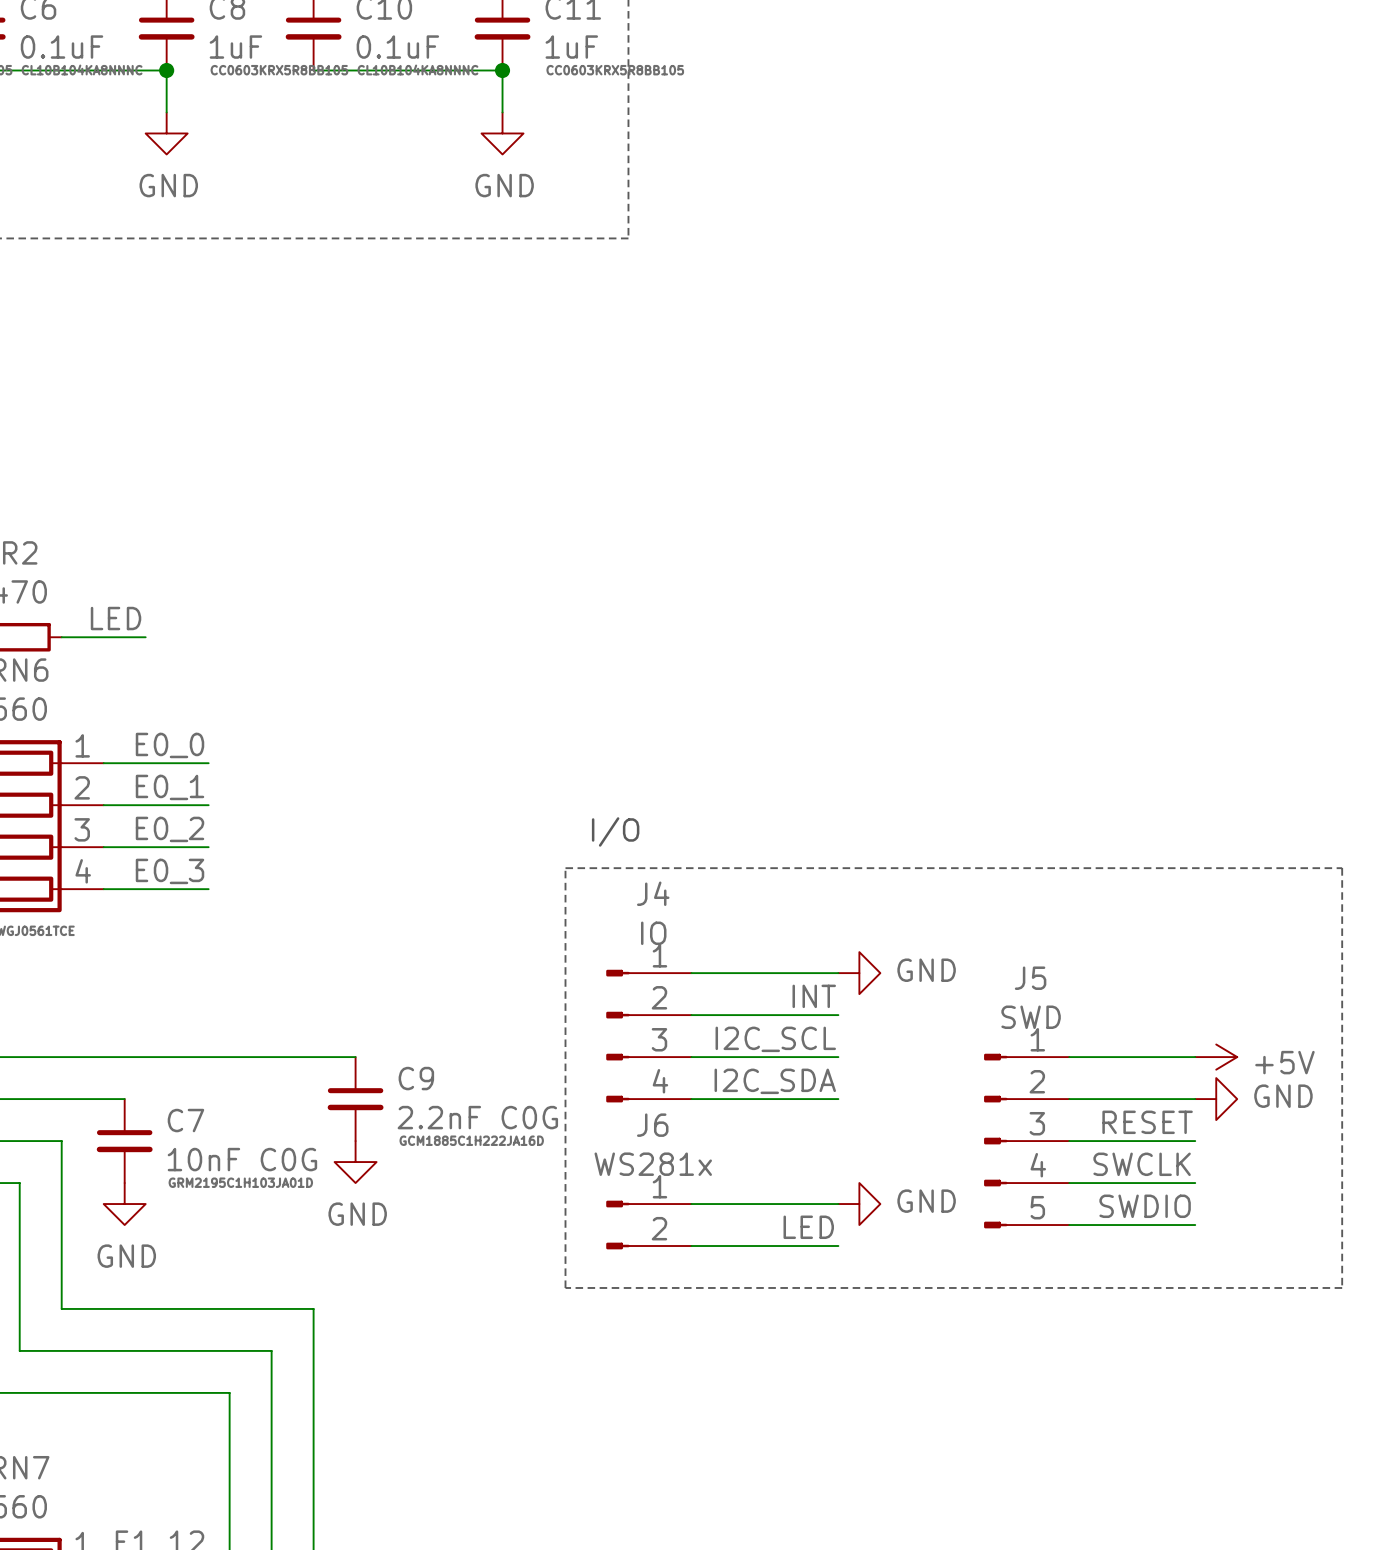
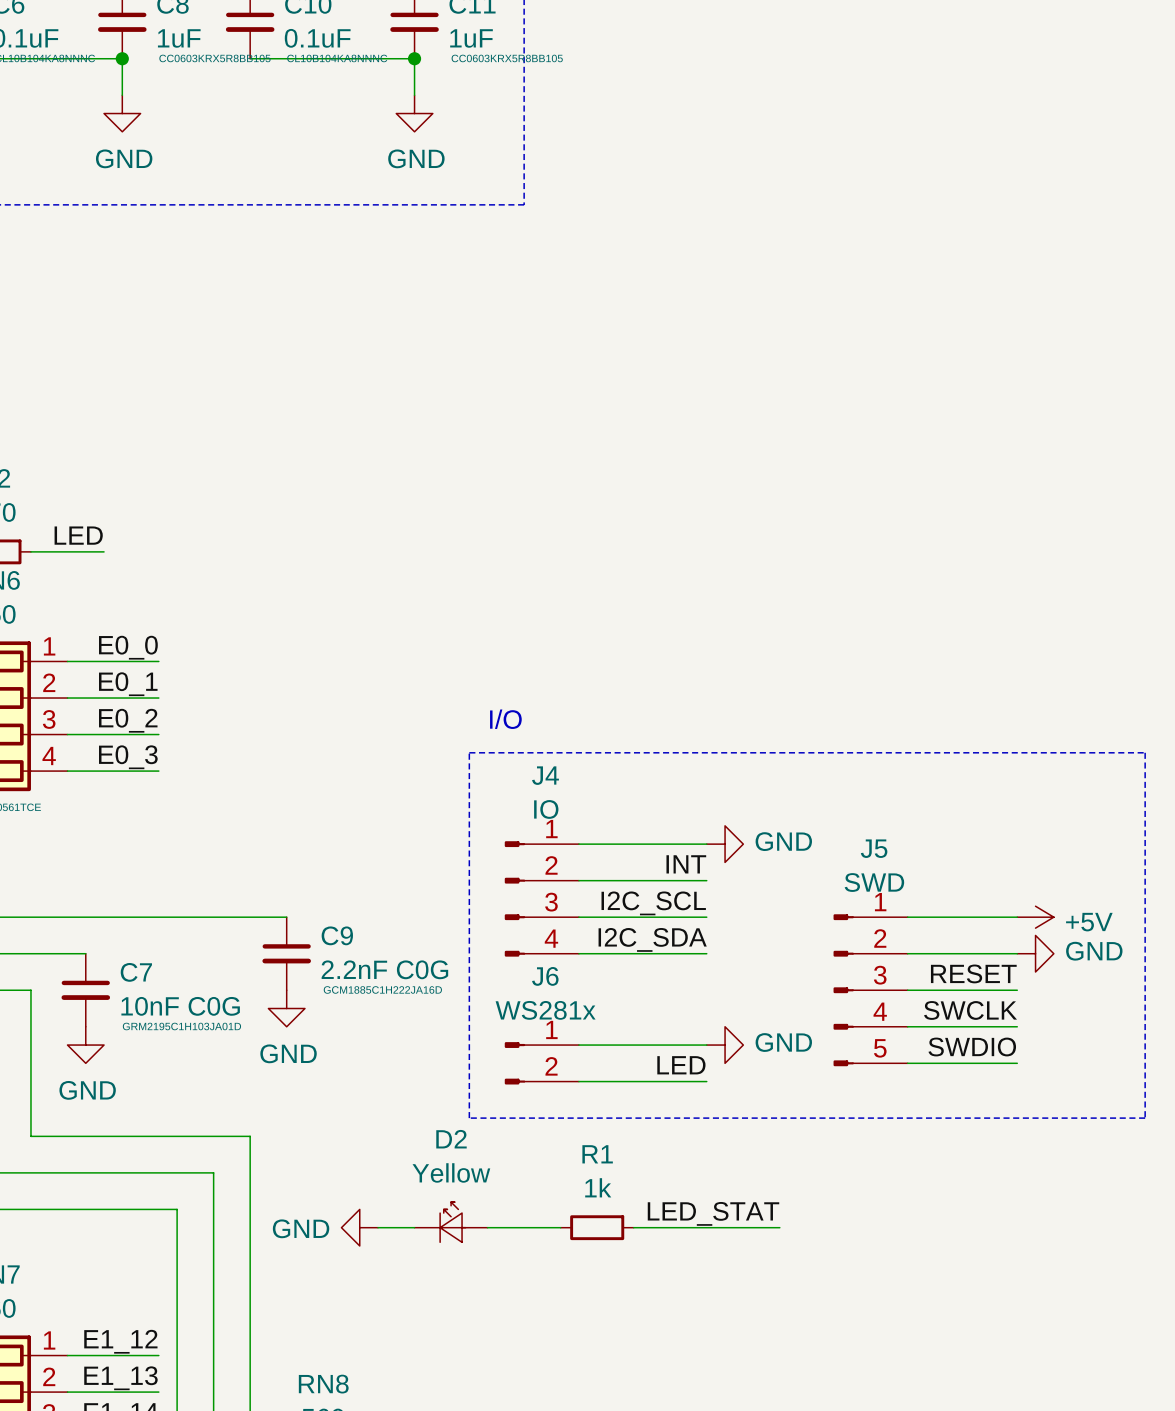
label: none -> LED_STAT (713, 1213)
D2: none -> Yellow (451, 1222)
power symbol: none -> GND (359, 1227)
wire: none -> (378, 1227) (414, 1227)
wire: none -> (487, 1227) (560, 1227)
R1: none -> 1k (597, 1227)
wire: none -> (633, 1227) (779, 1227)

